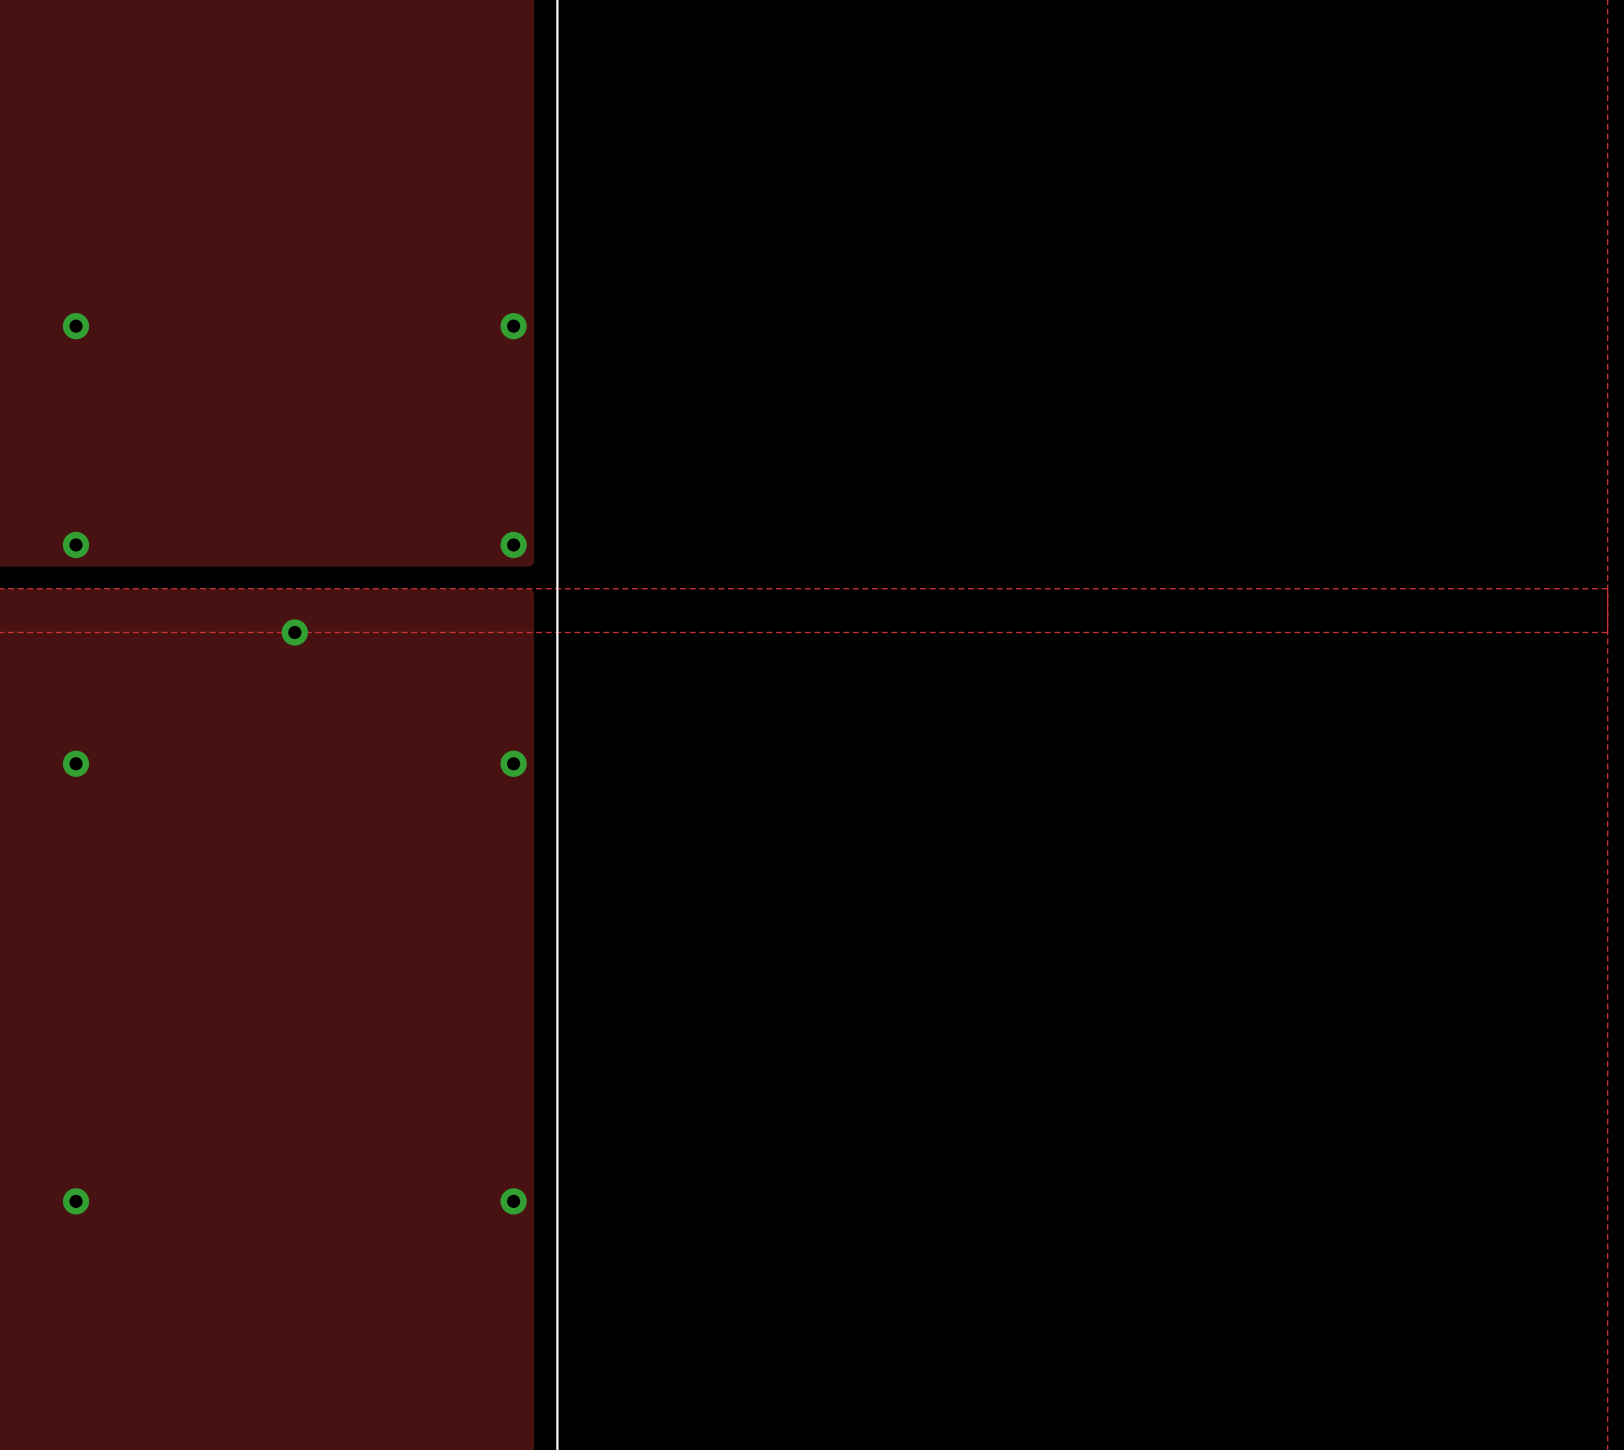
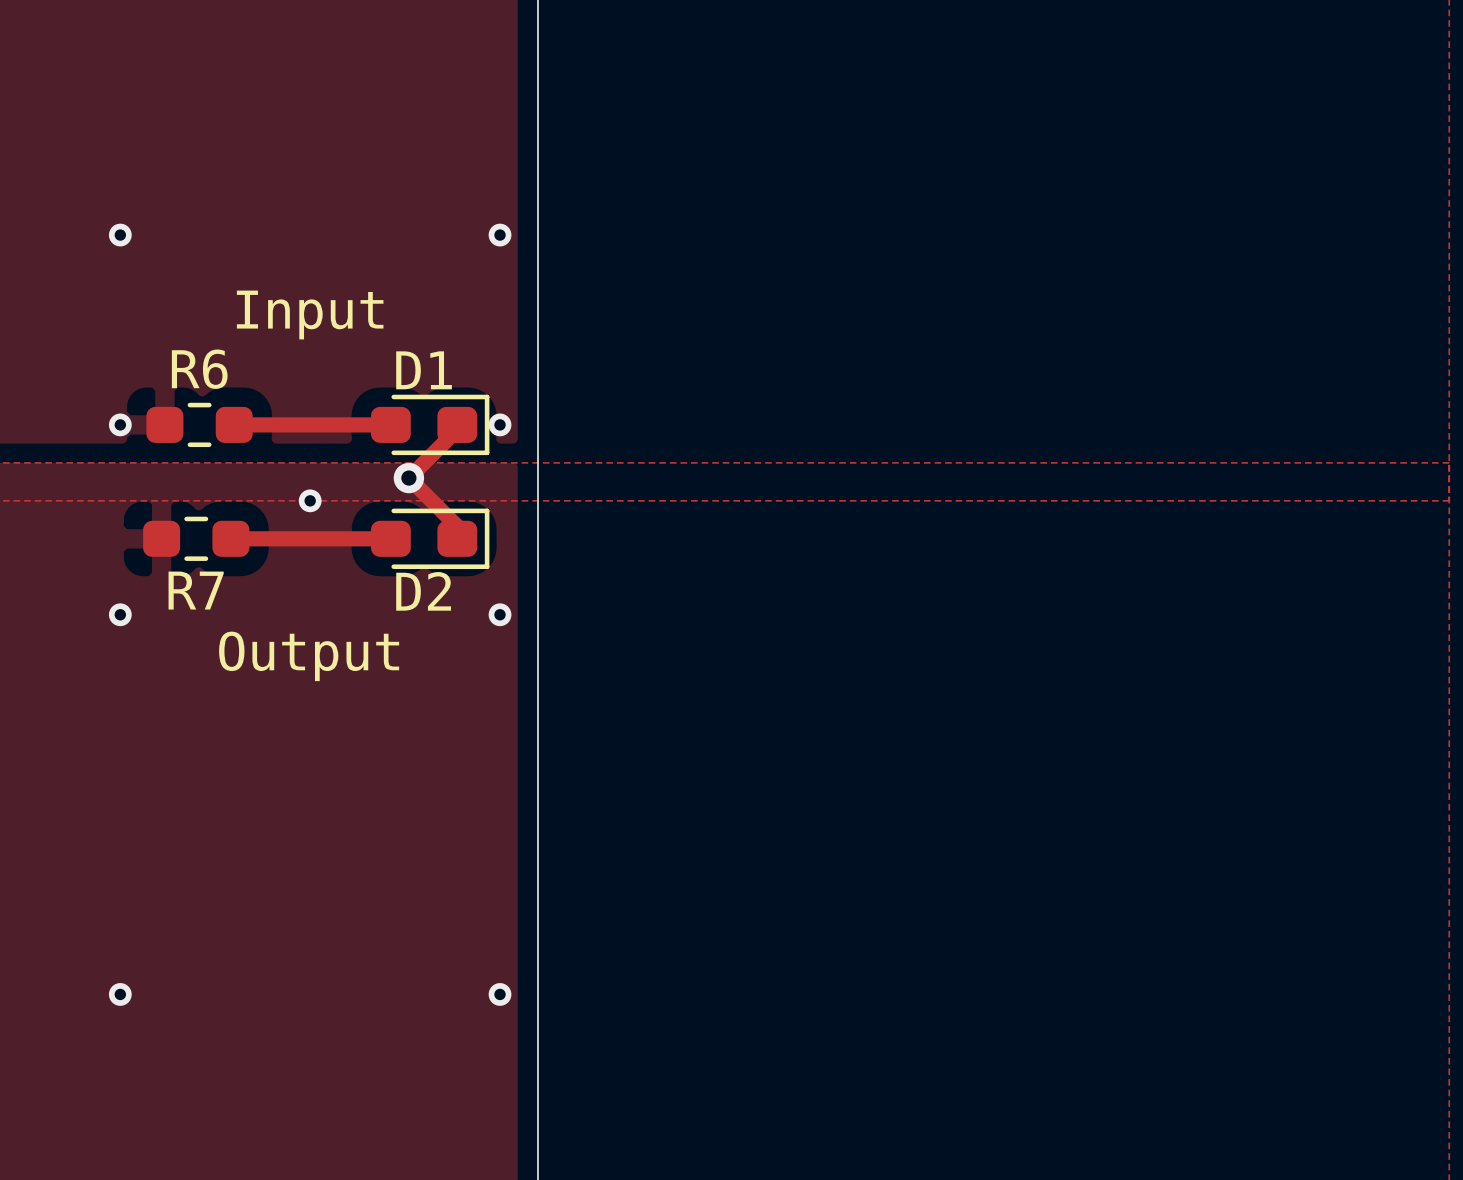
text: none -> Input (310, 314)
R6: none -> (199, 424)
track: none -> (234, 424) (390, 424)
D1: none -> (430, 424)
track: none -> (457, 424) (457, 429) (408, 478) (457, 526) (457, 538)
via: none -> (408, 478)
R7: none -> (196, 538)
track: none -> (230, 538) (390, 538)
D2: none -> (430, 538)
text: none -> Output (309, 656)

